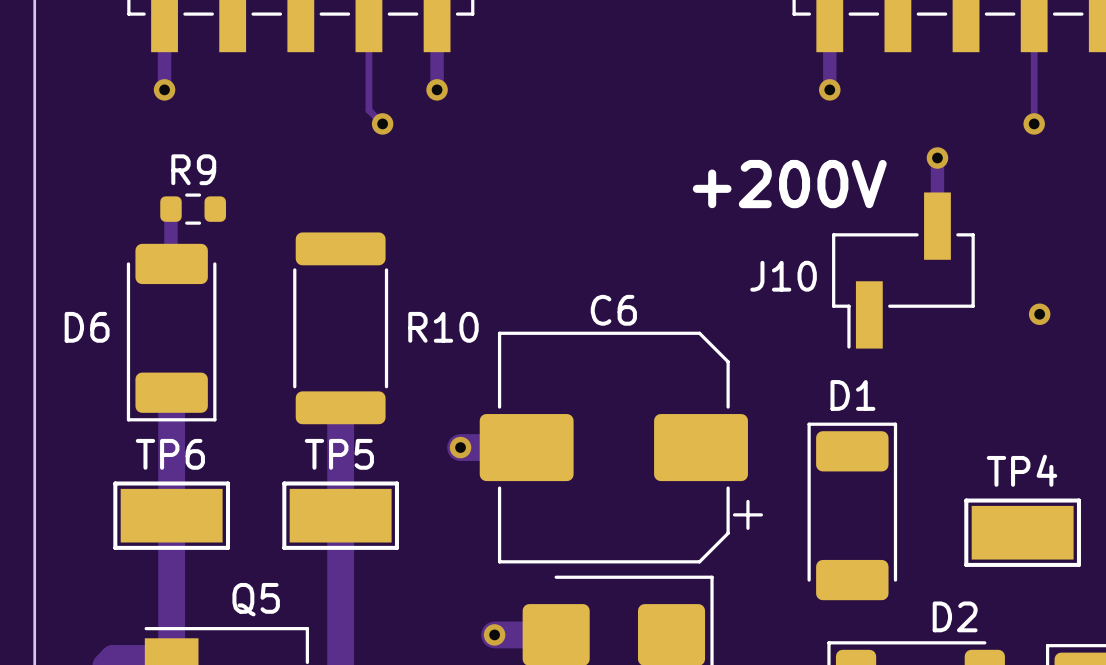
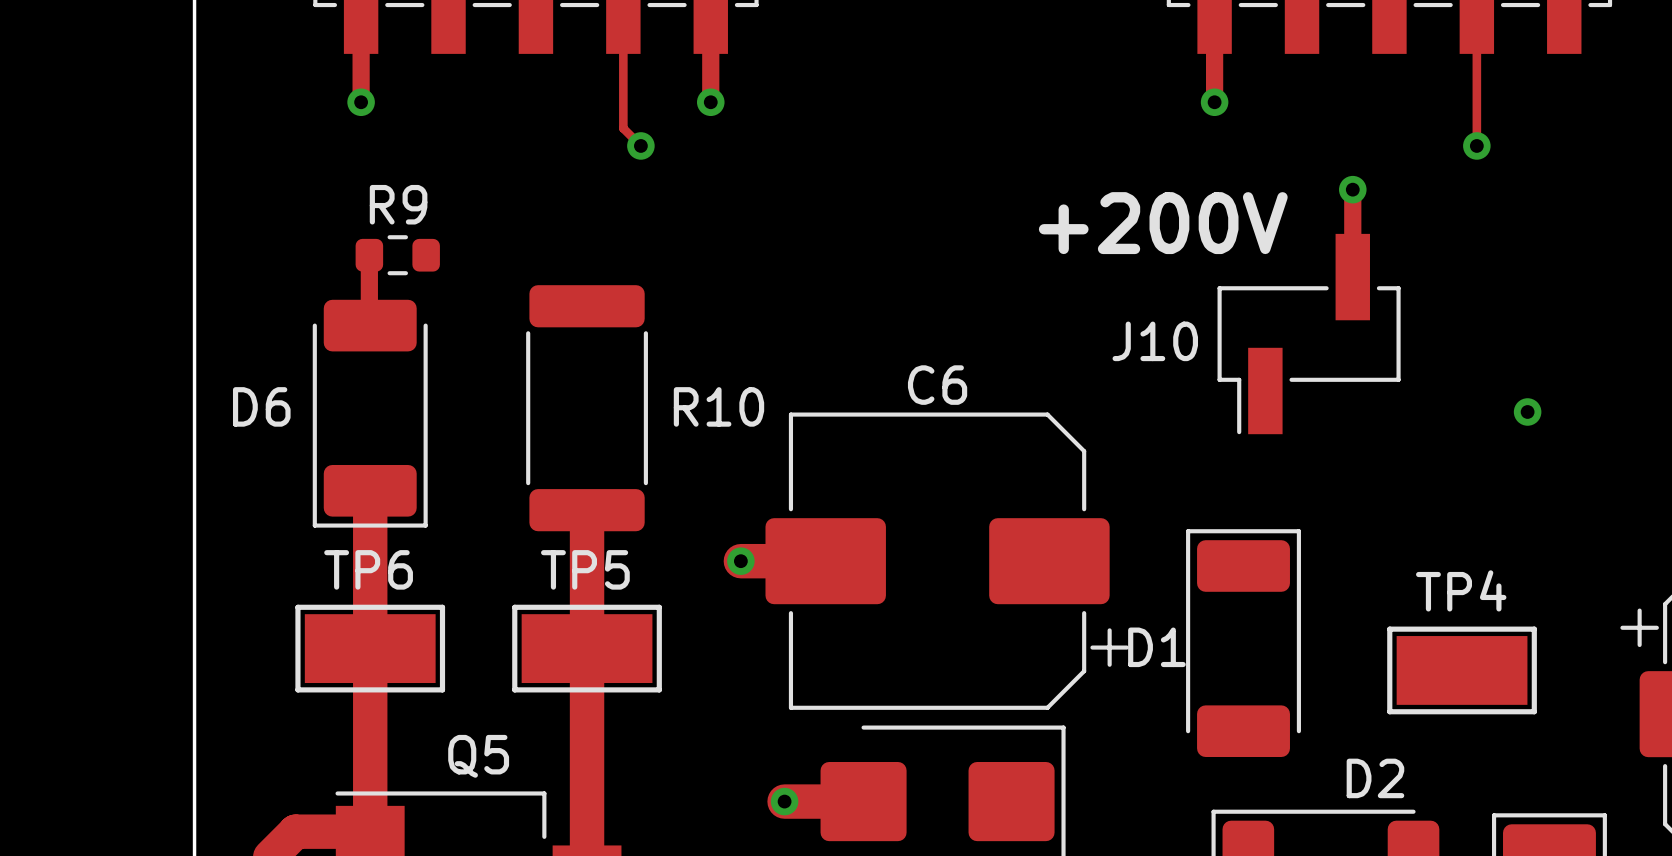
via position: (1039, 314) -> (1527, 411)
D1 name position: D1 (852, 395) -> D1 (1156, 647)

